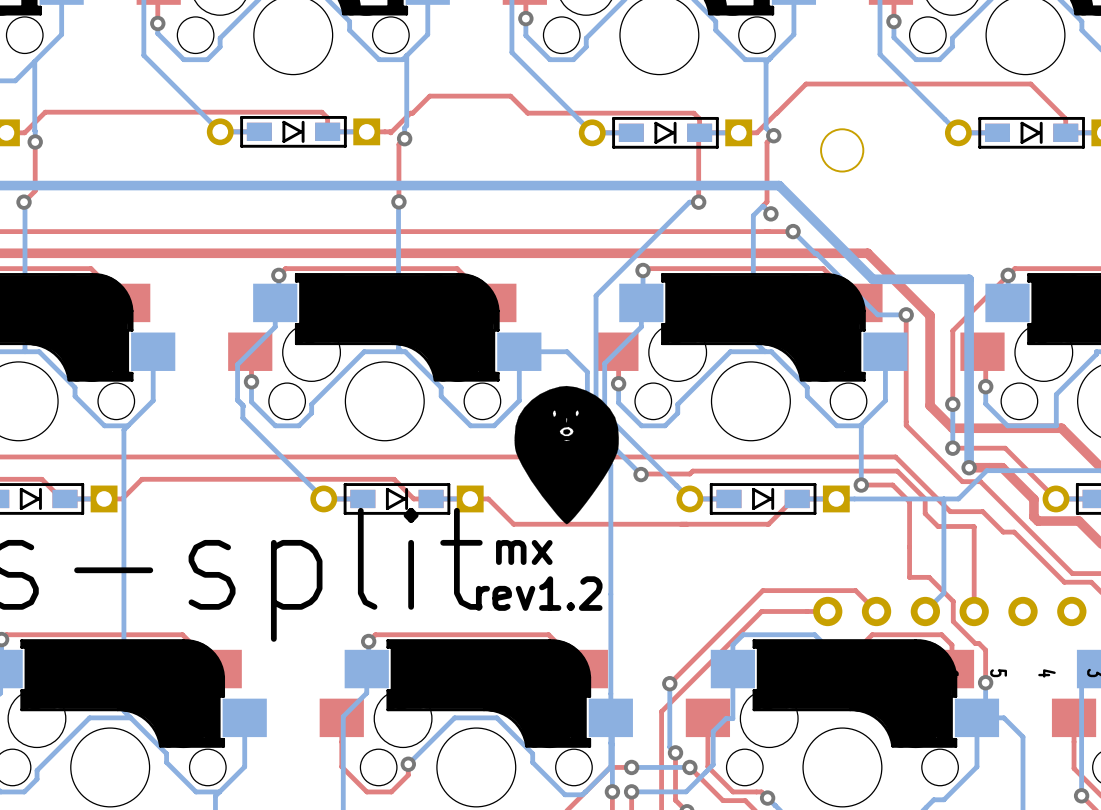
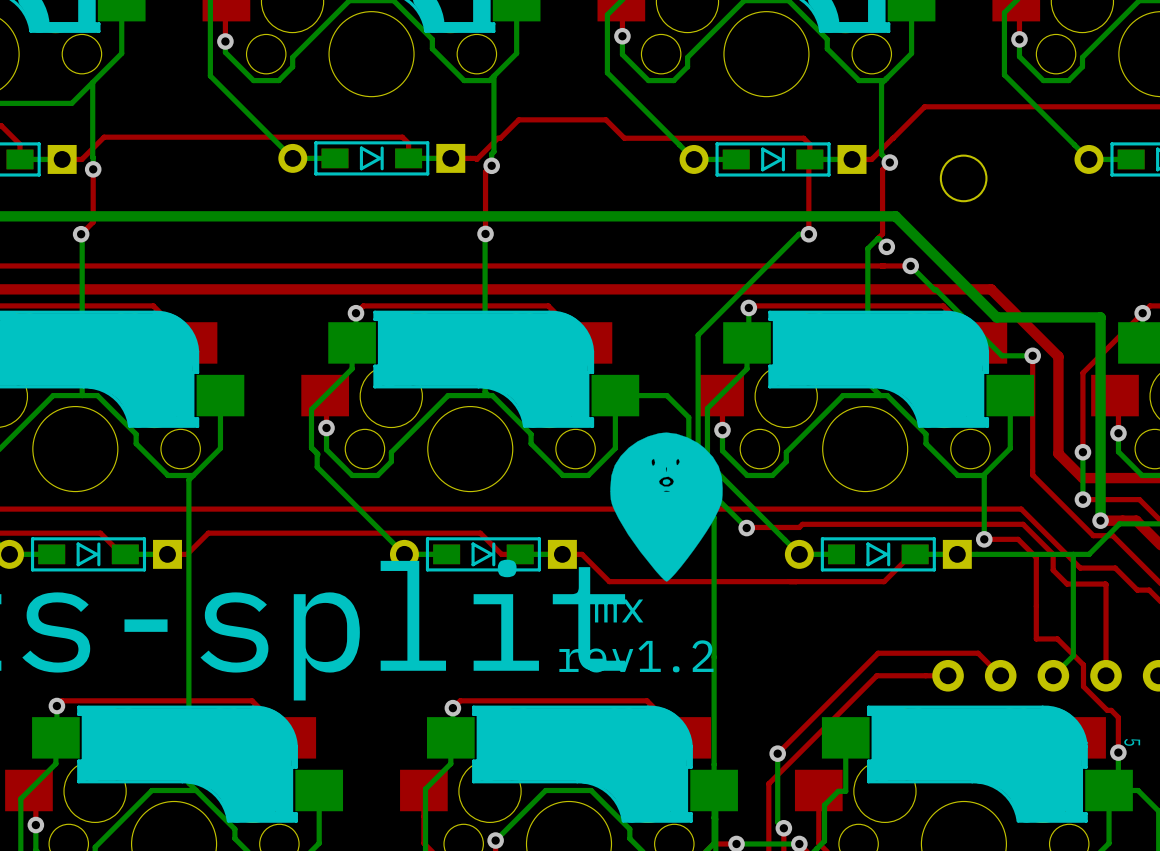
top track: (843, 663) (872, 634) (941, 634) (951, 645) (951, 669) -> none
bottom track: (843, 663) (814, 634) (743, 634) (732, 645) (732, 669) -> none

